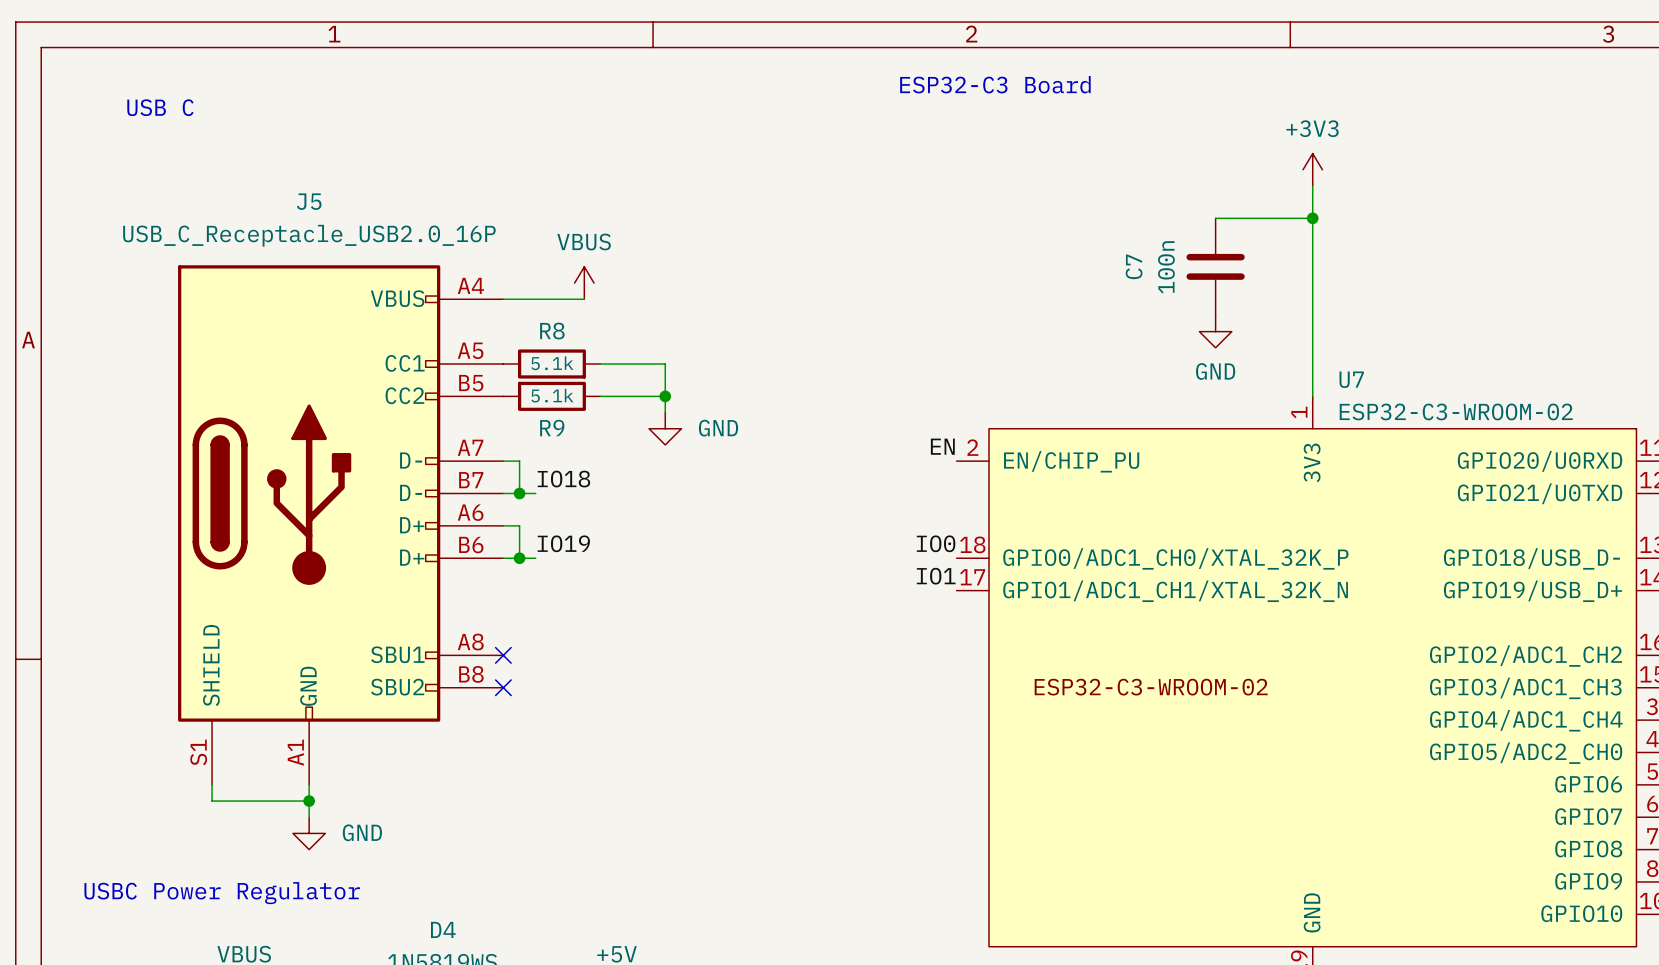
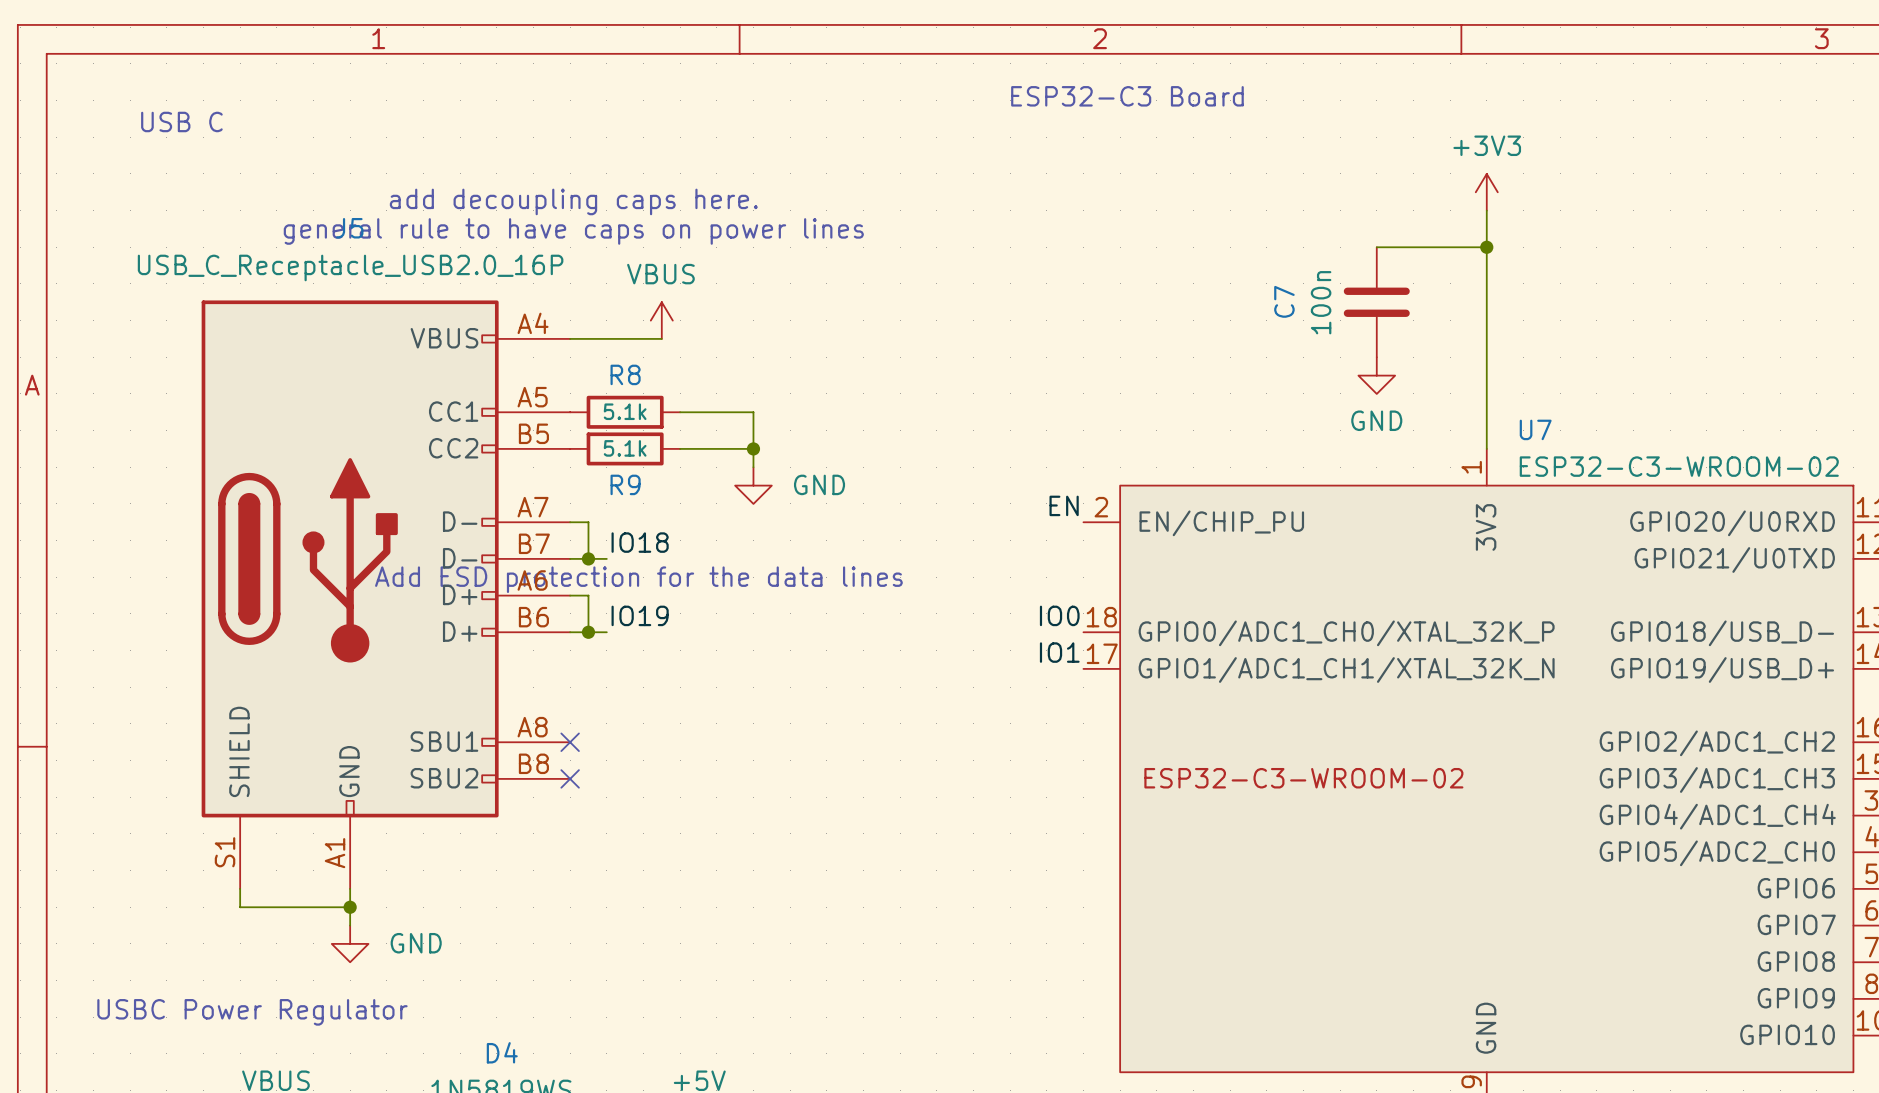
text: none -> add decoupling caps here. (573, 201)
text: none -> general rule to have caps on power lines (573, 231)
text: none -> Add ESD protection for the data lines (638, 579)

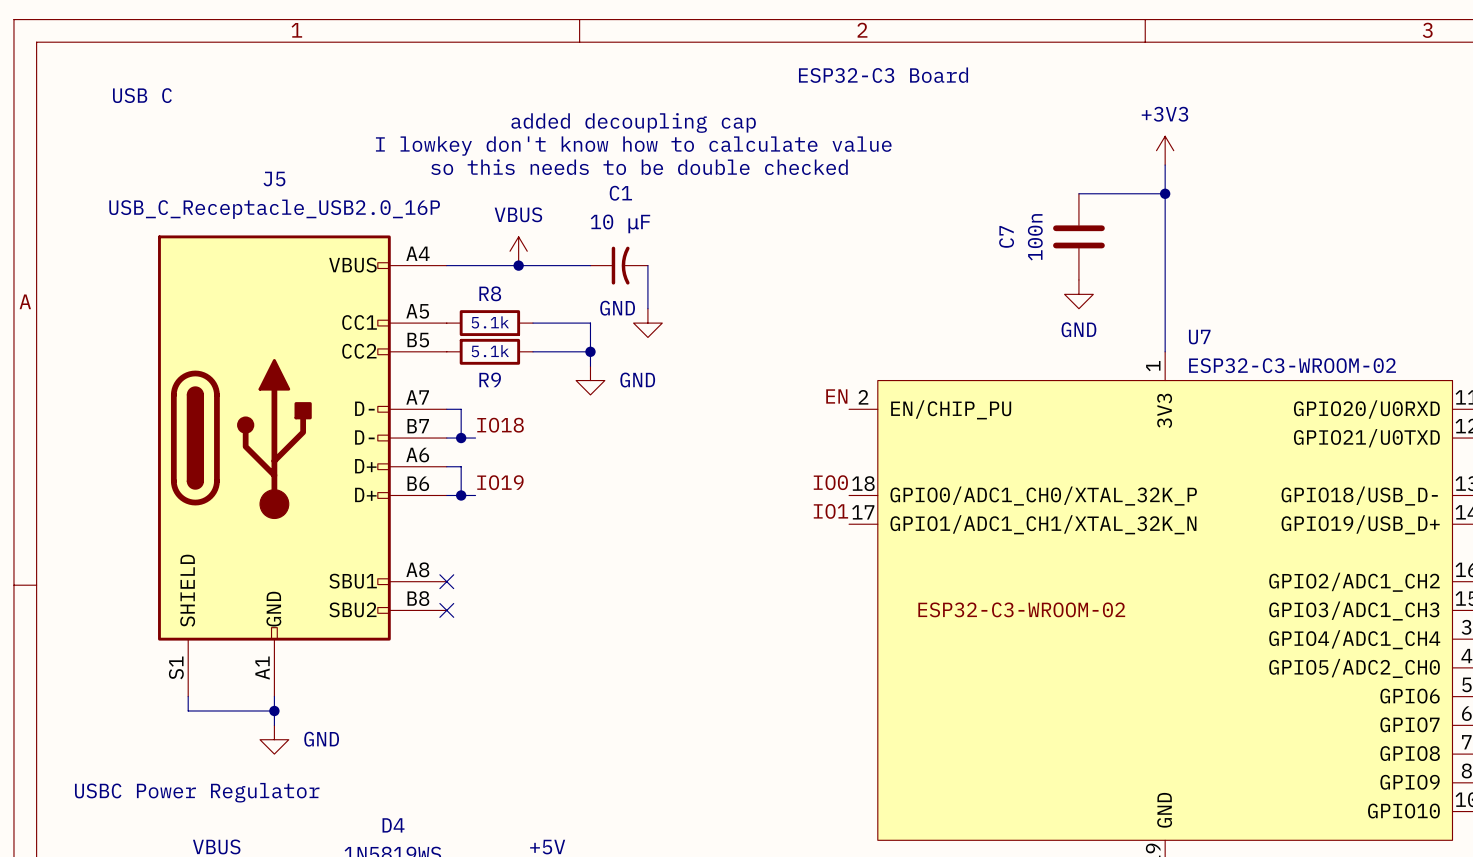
text: none -> added decoupling cap (633, 122)
text: none -> I lowkey don't know how to calculate value (633, 146)
text: add decoupling caps here. (573, 201) -> none
text: none -> so this needs to be double checked (639, 167)
text: general rule to have caps on power lines (573, 231) -> none
wire: none -> (518, 265) (590, 265)
junction: none -> (518, 265)
C1: none -> 10 μF (619, 265)
wire: none -> (647, 265) (647, 308)
power symbol: none -> GND (647, 323)
text: Add ESD protection for the data lines (638, 579) -> none

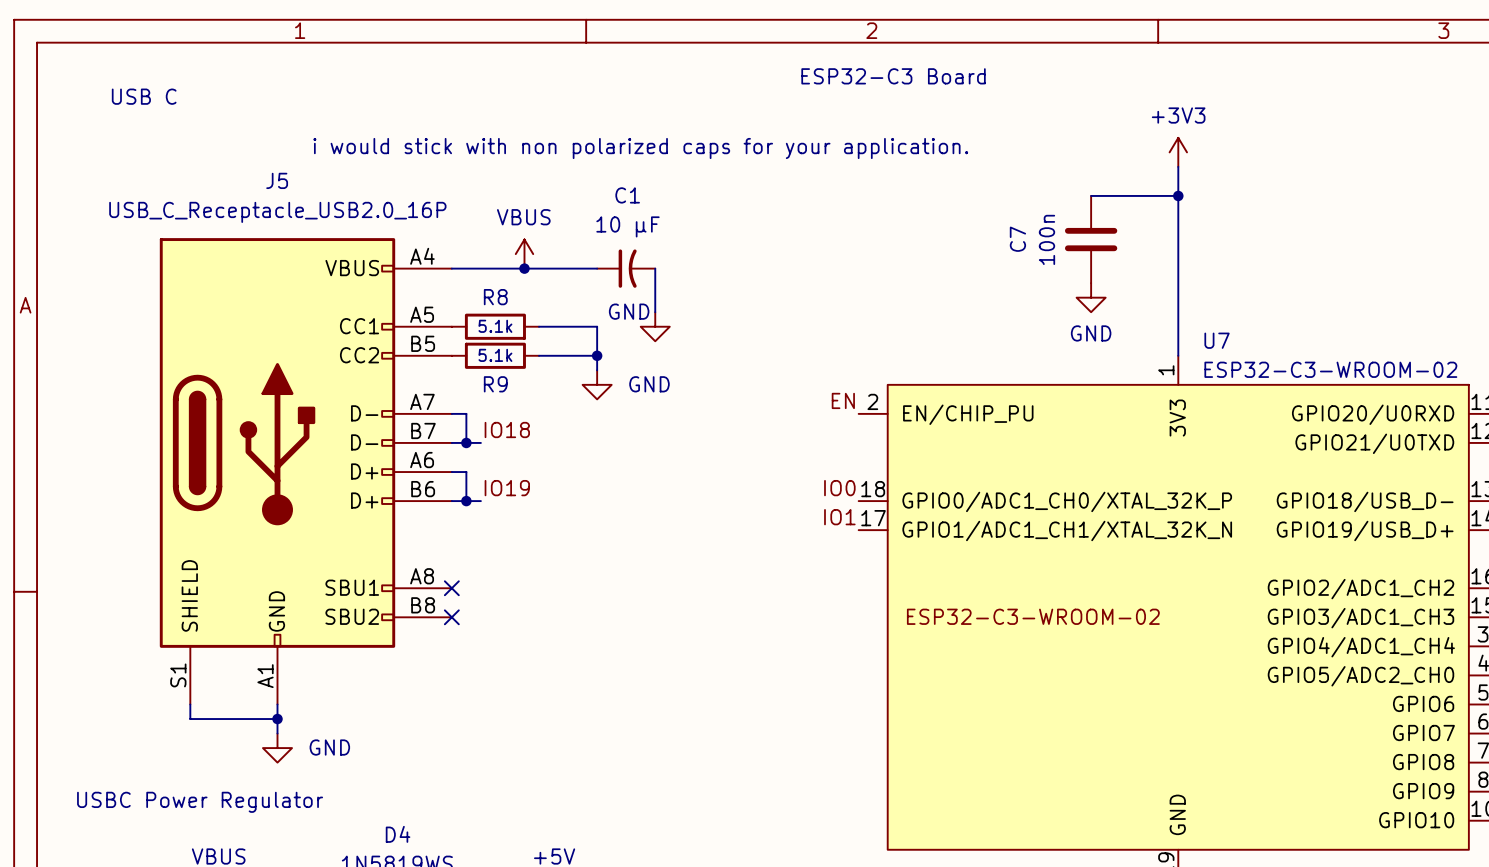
text: added decoupling cap (633, 122) -> none
text: I lowkey don't know how to calculate value (633, 146) -> i would stick with non polarized caps for your application. (640, 148)
text: so this needs to be double checked (639, 167) -> none

